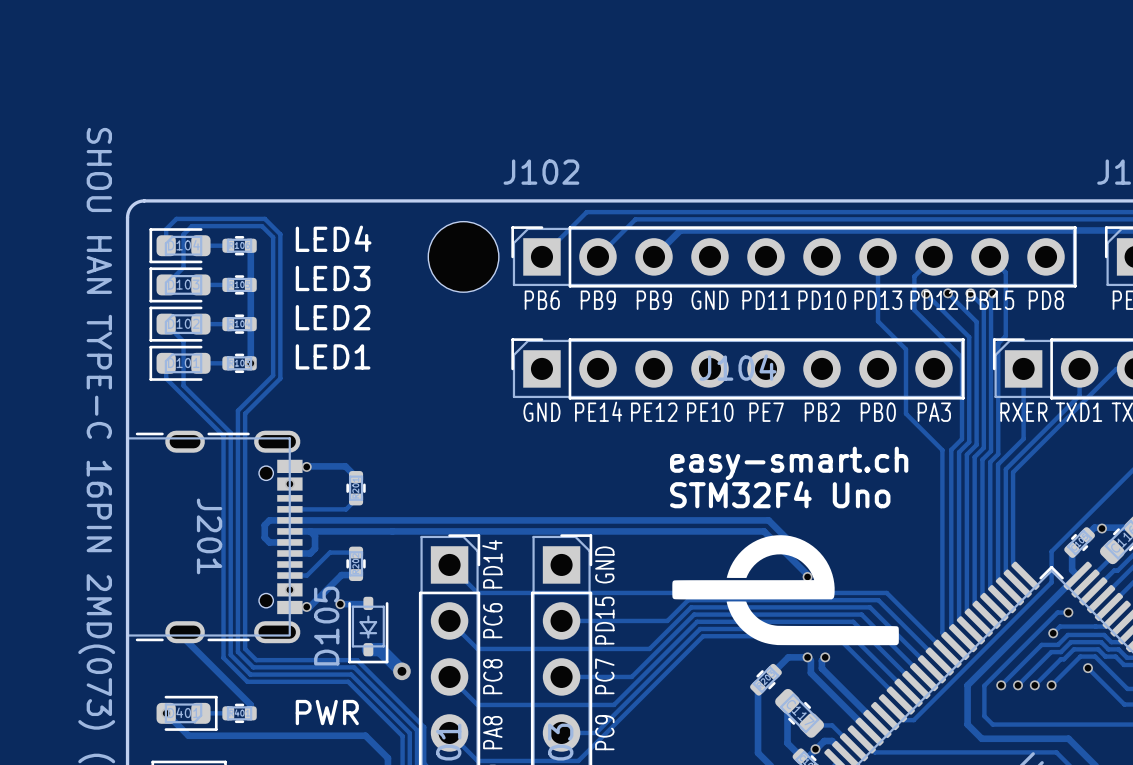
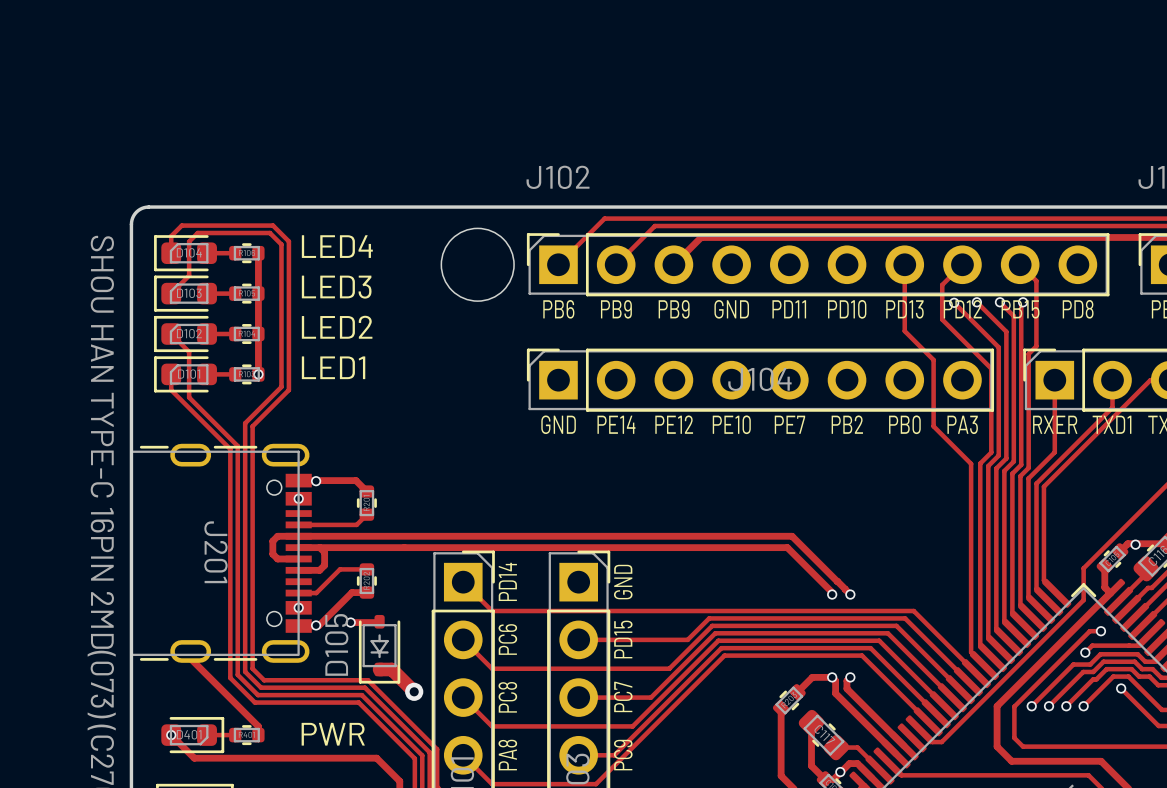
text: easy-smart.ch (789, 463) -> none
text: STM32F4 Uno (780, 494) -> none
drawing: [672, 535, 899, 646] -> none

